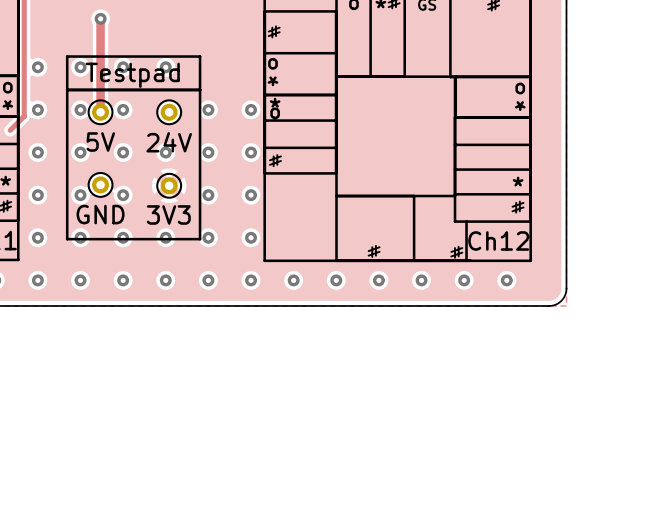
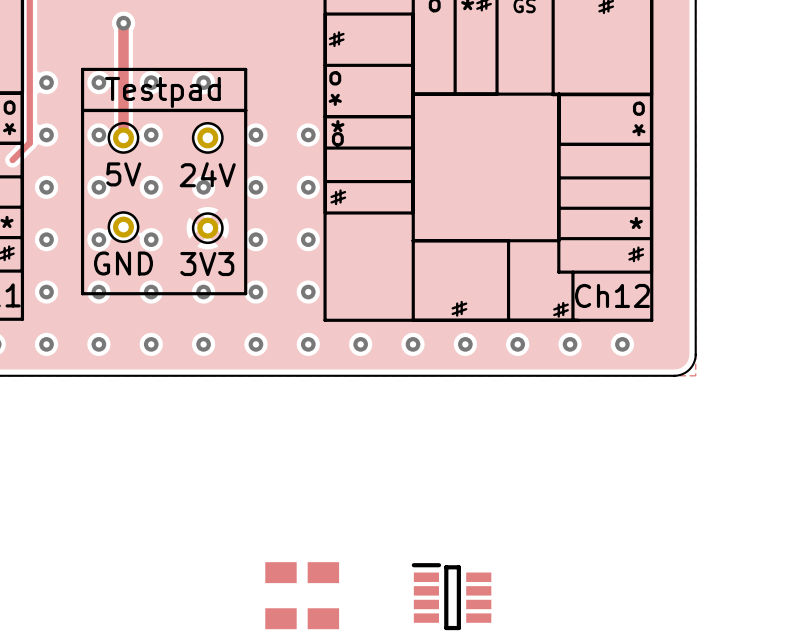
part: none -> (280, 595)
part: none -> (323, 595)
part: none -> (451, 596)

